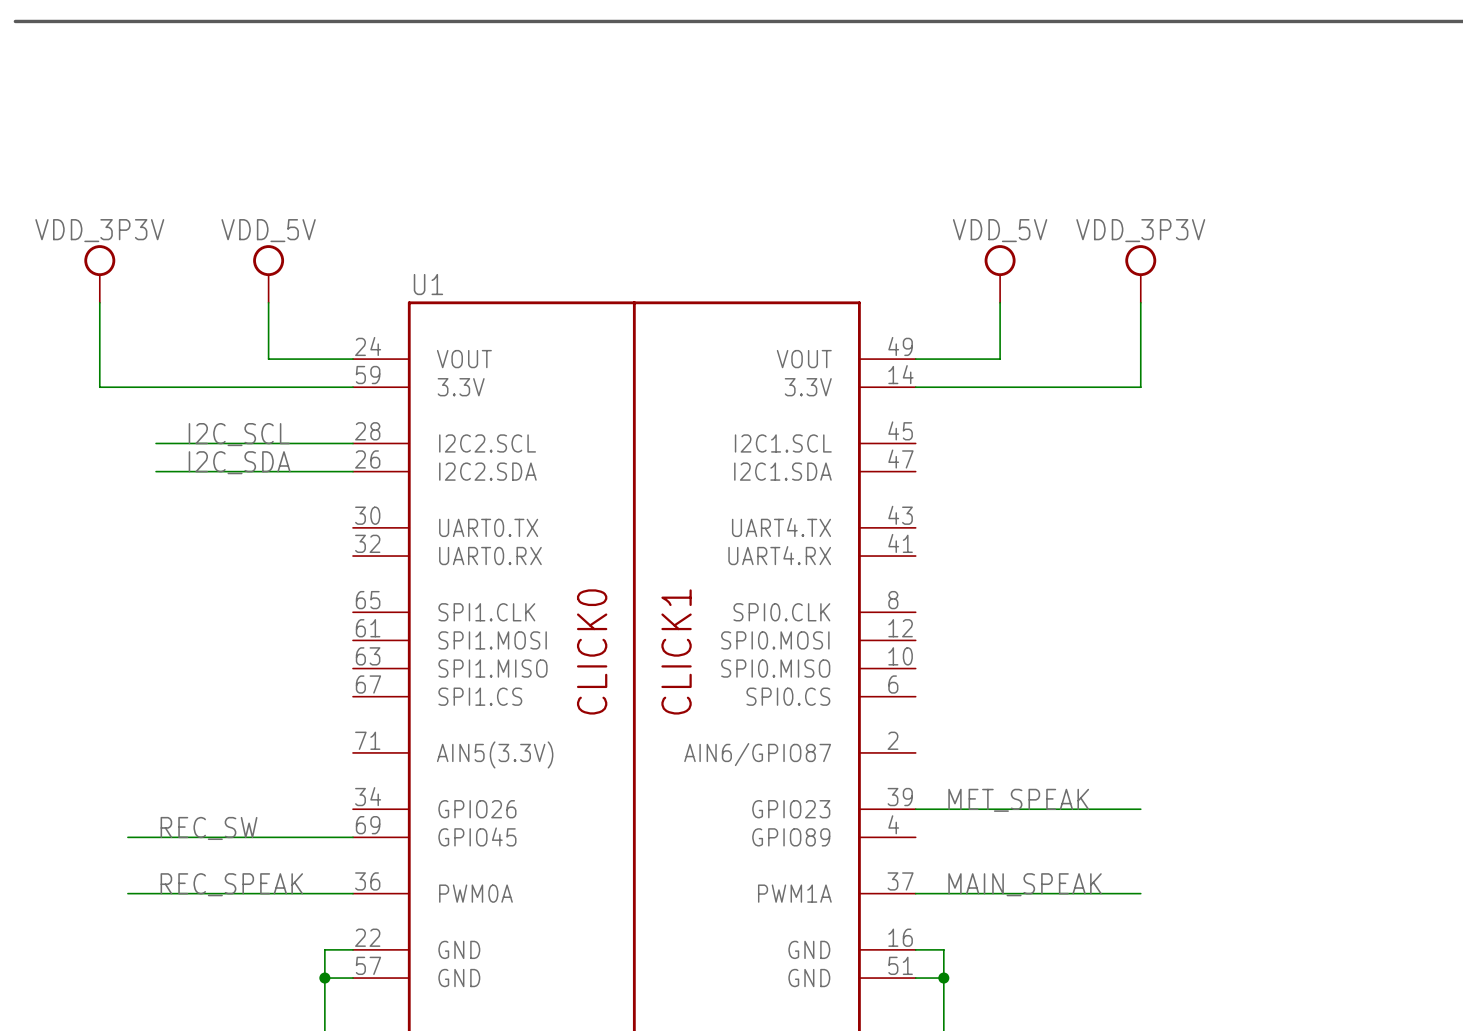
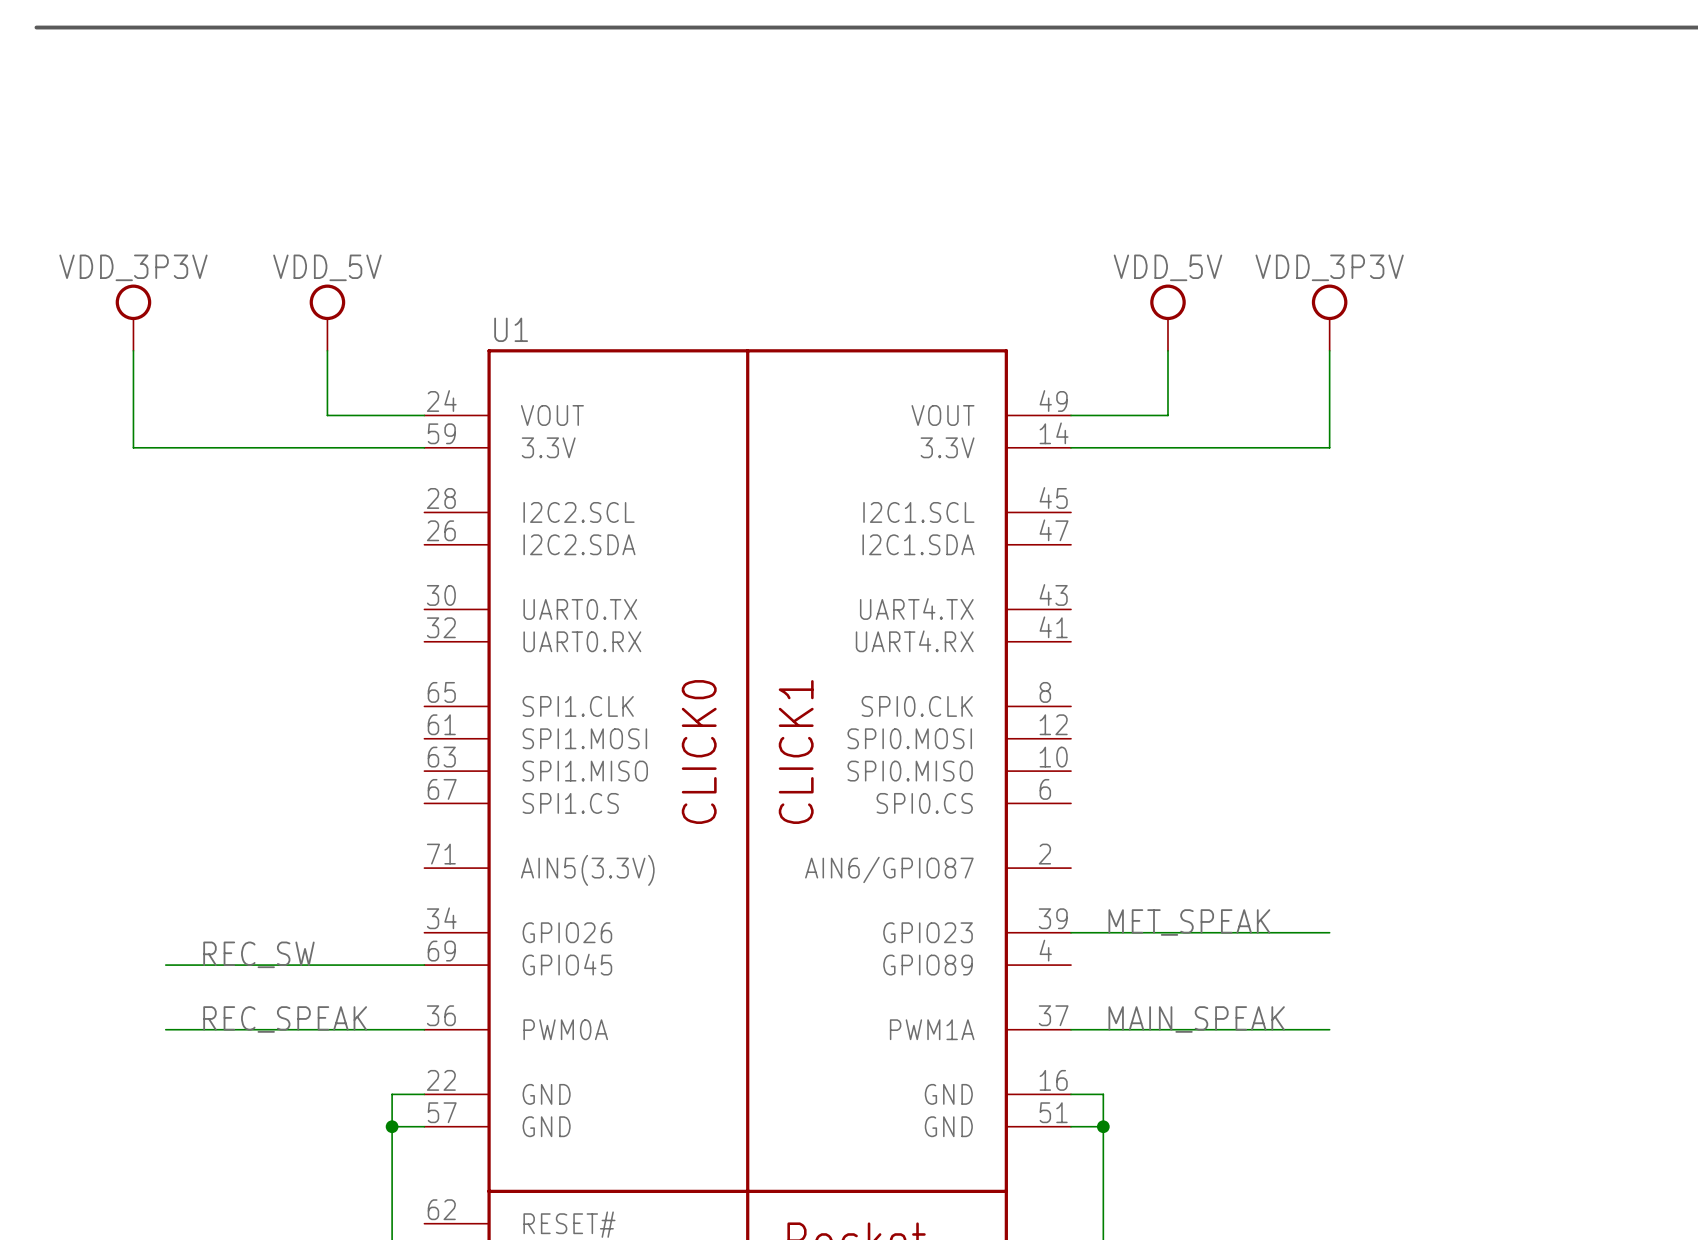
label: I2C_SCL (239, 434) -> none
wire: (156, 443) (353, 443) -> none
label: I2C_SDA (239, 462) -> none
wire: (156, 471) (353, 471) -> none

